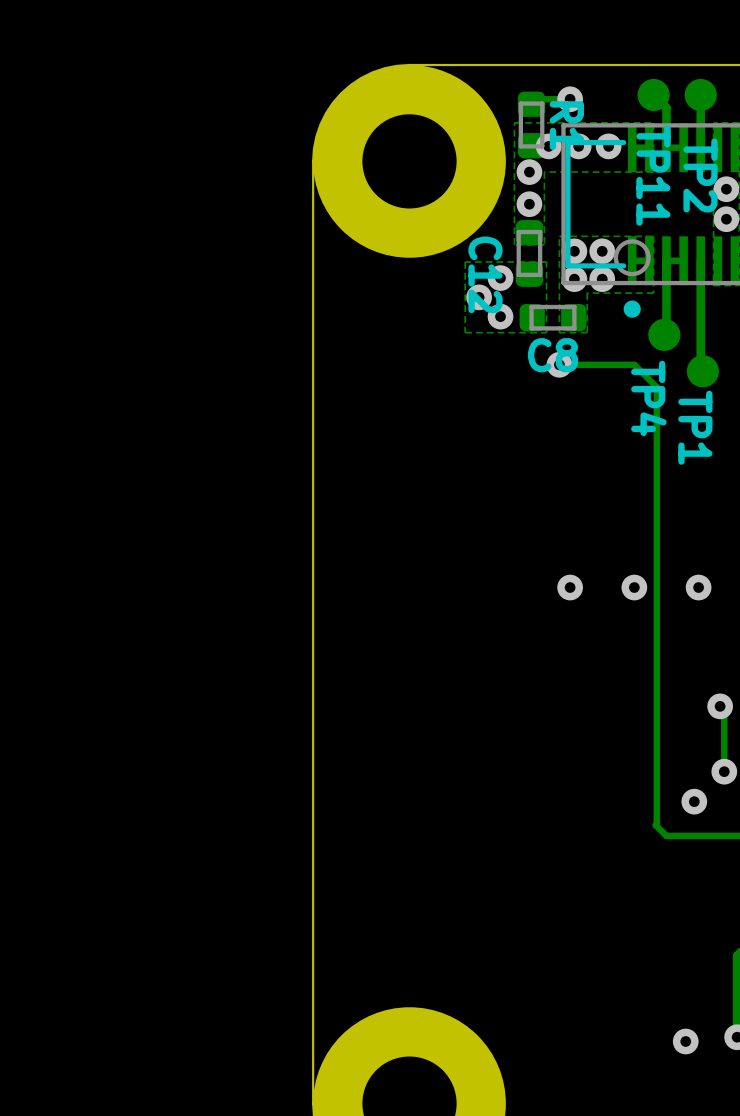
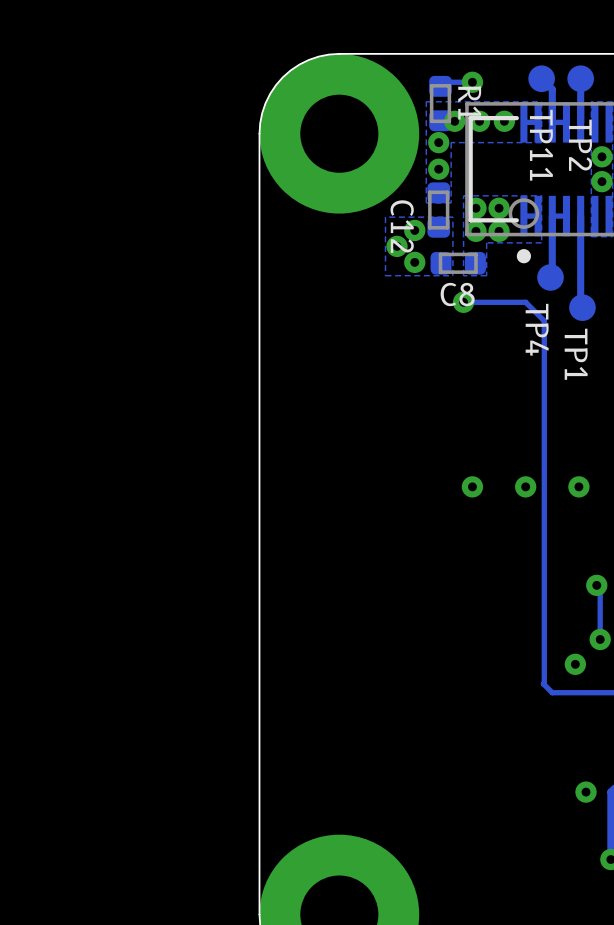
via: none -> (586, 792)
via: (685, 1041) -> none

